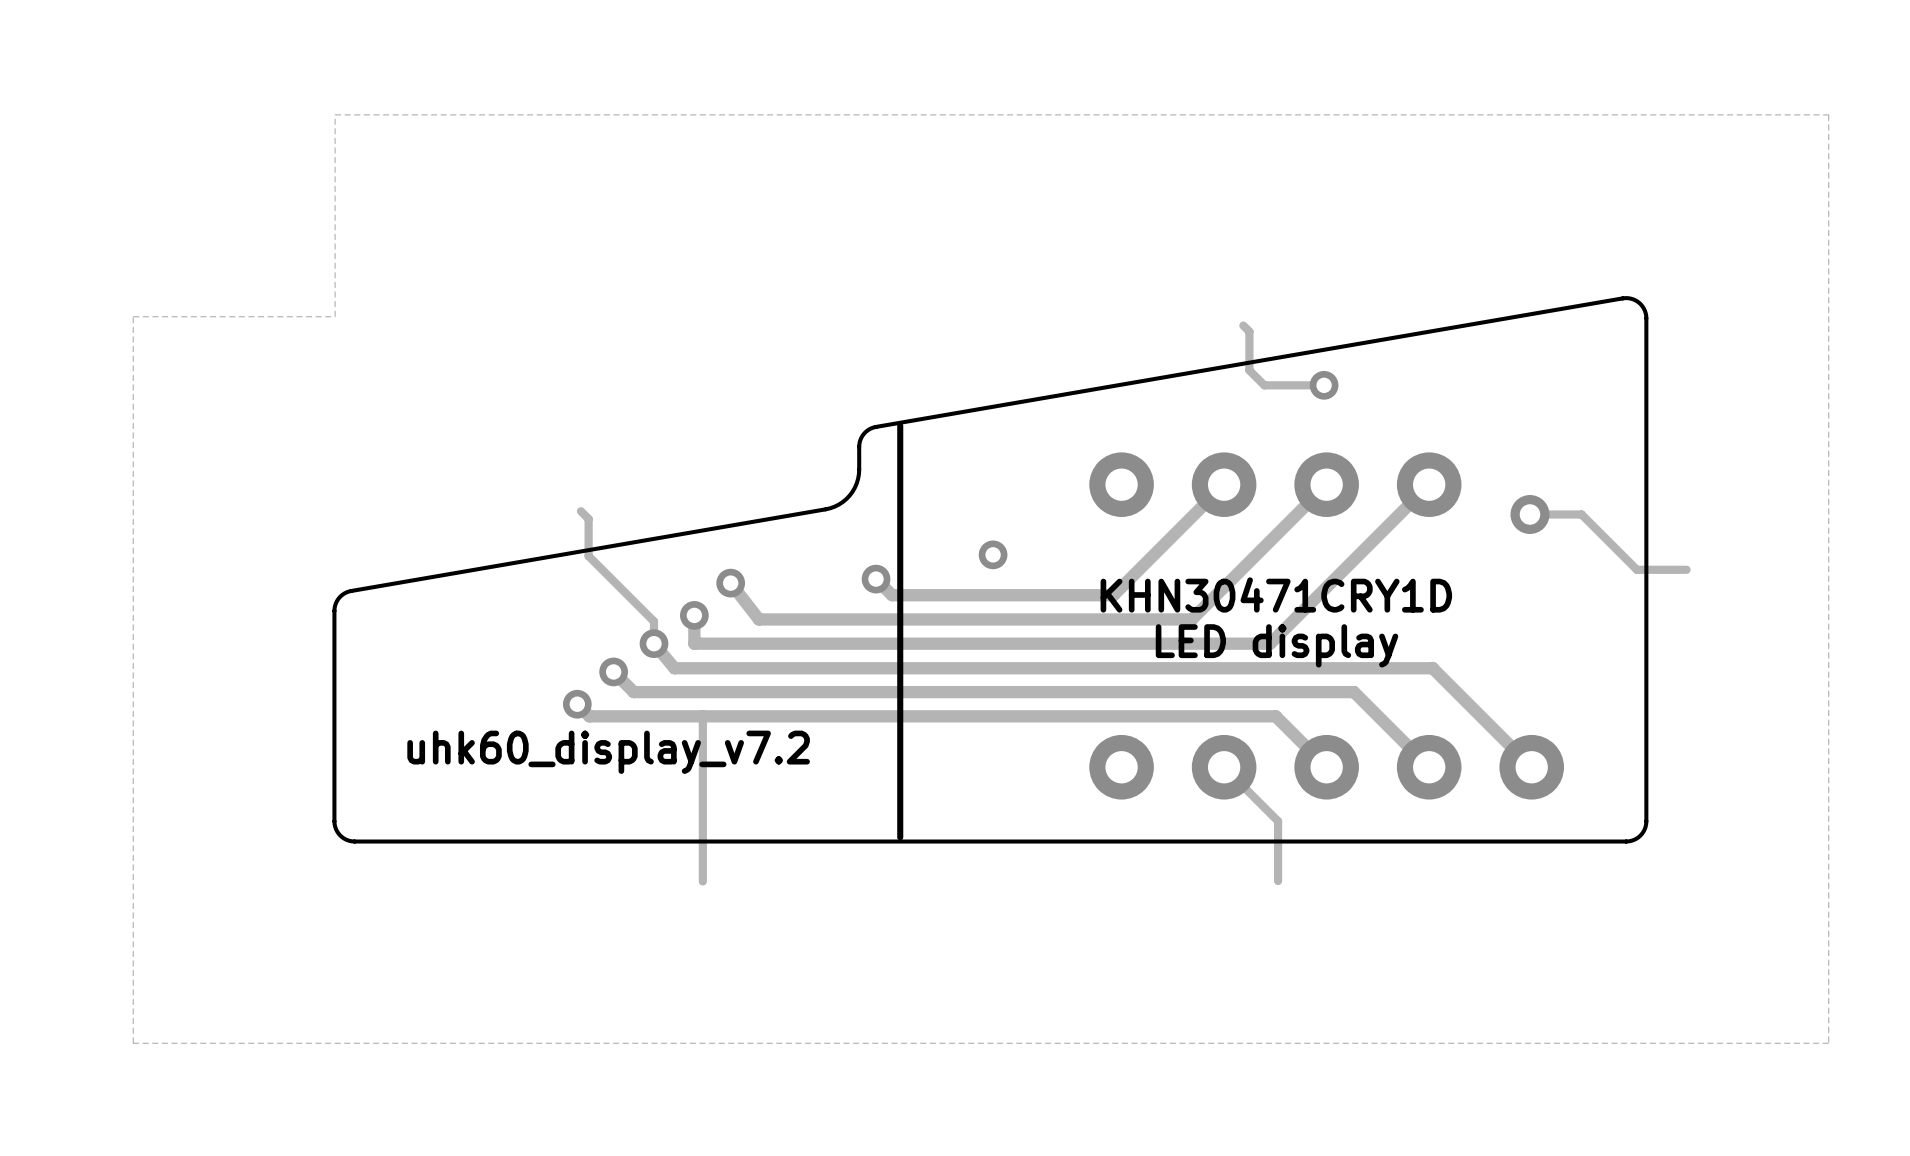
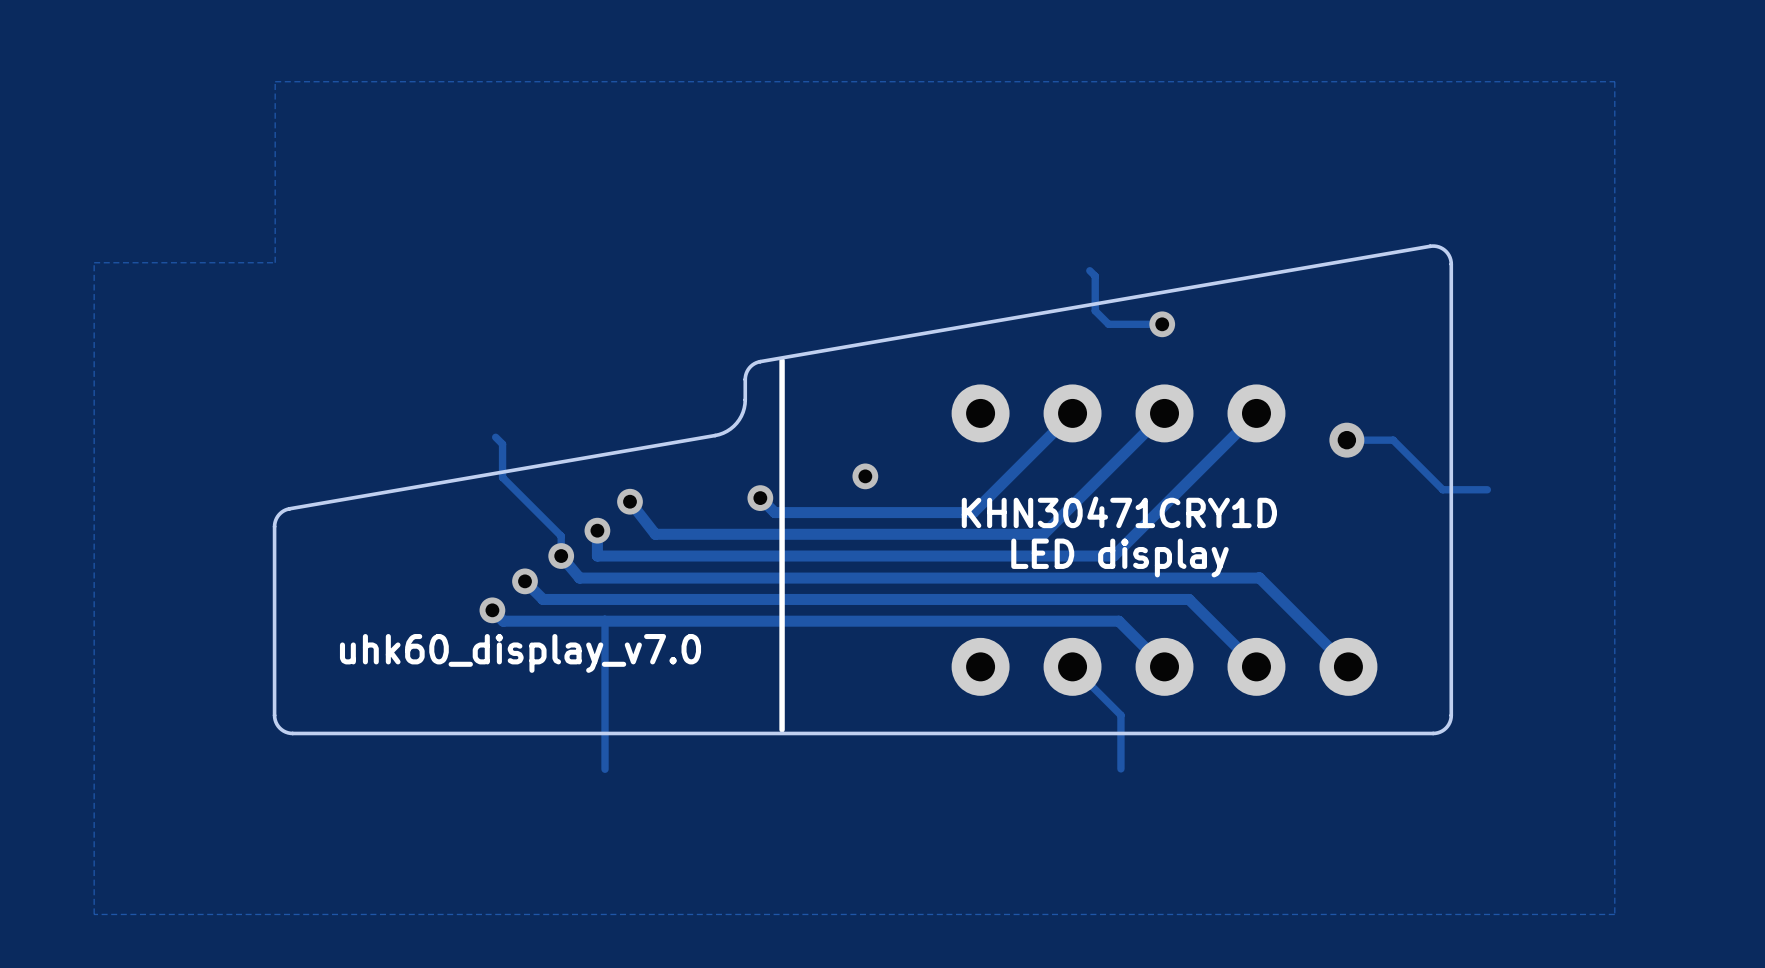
text: uhk60_display_v7.2 (608, 752) -> uhk60_display_v7.0 (520, 653)

